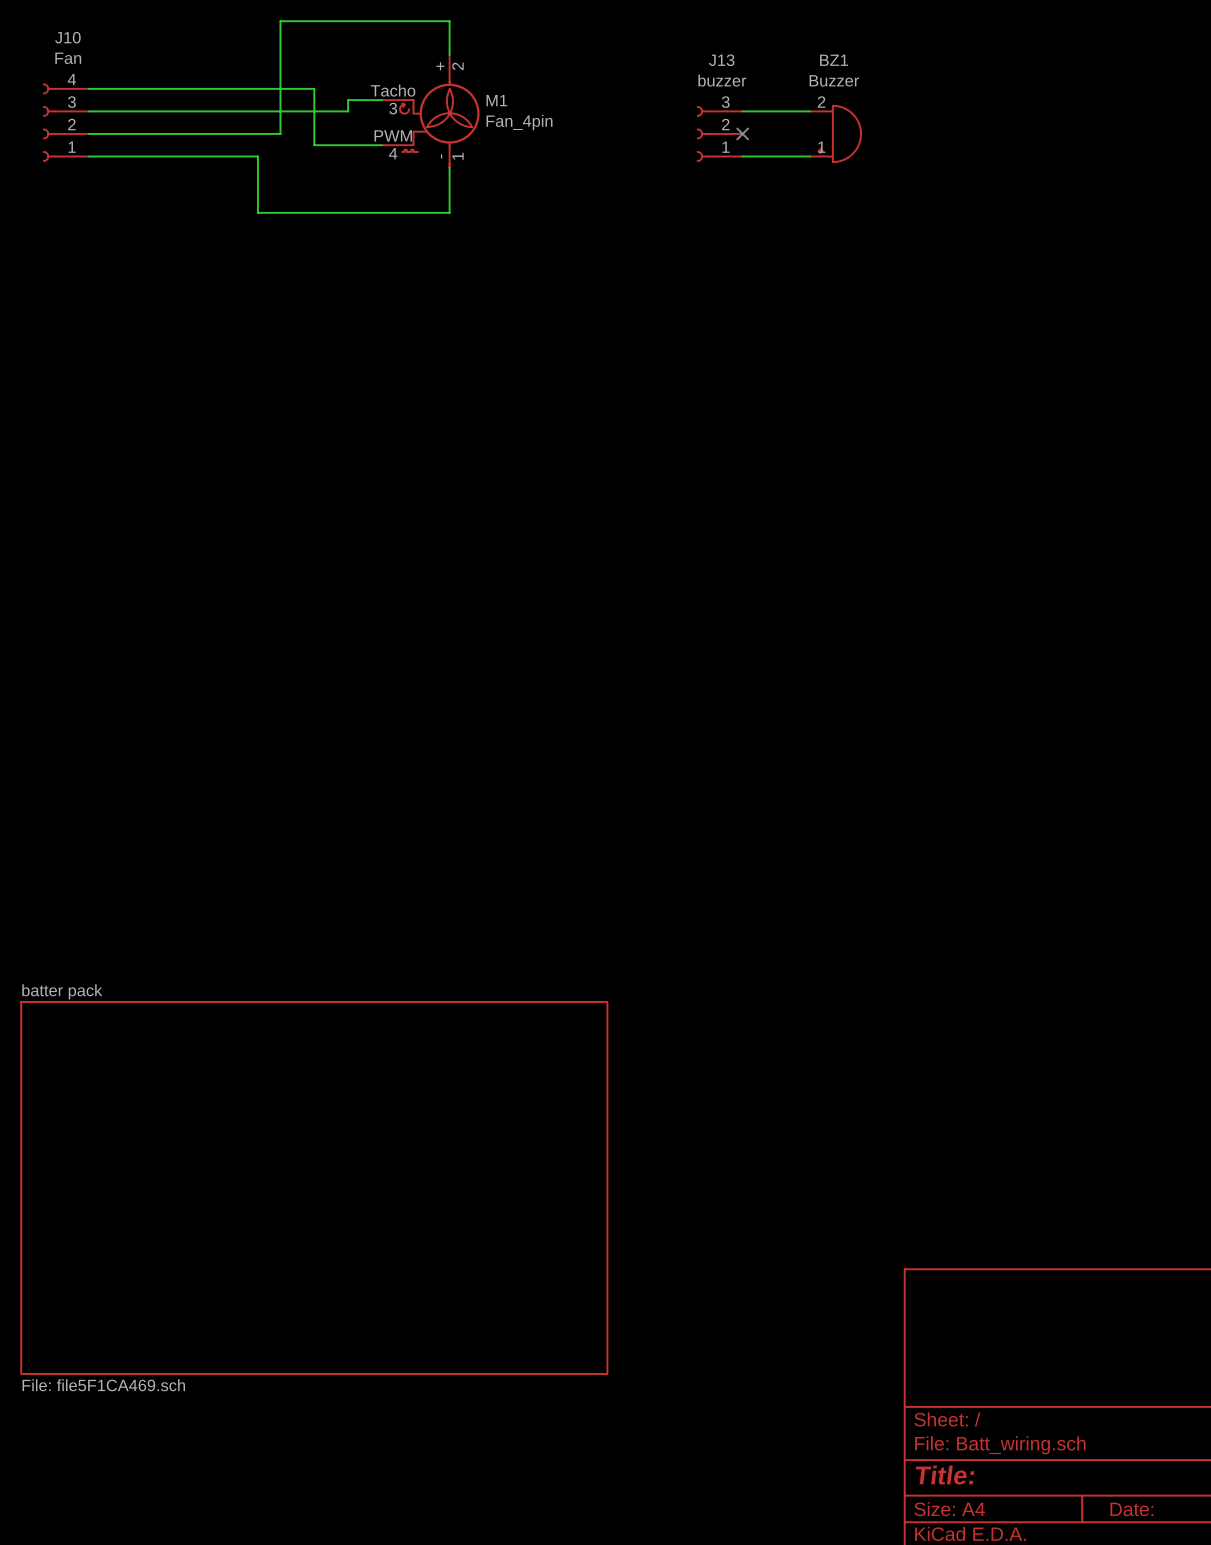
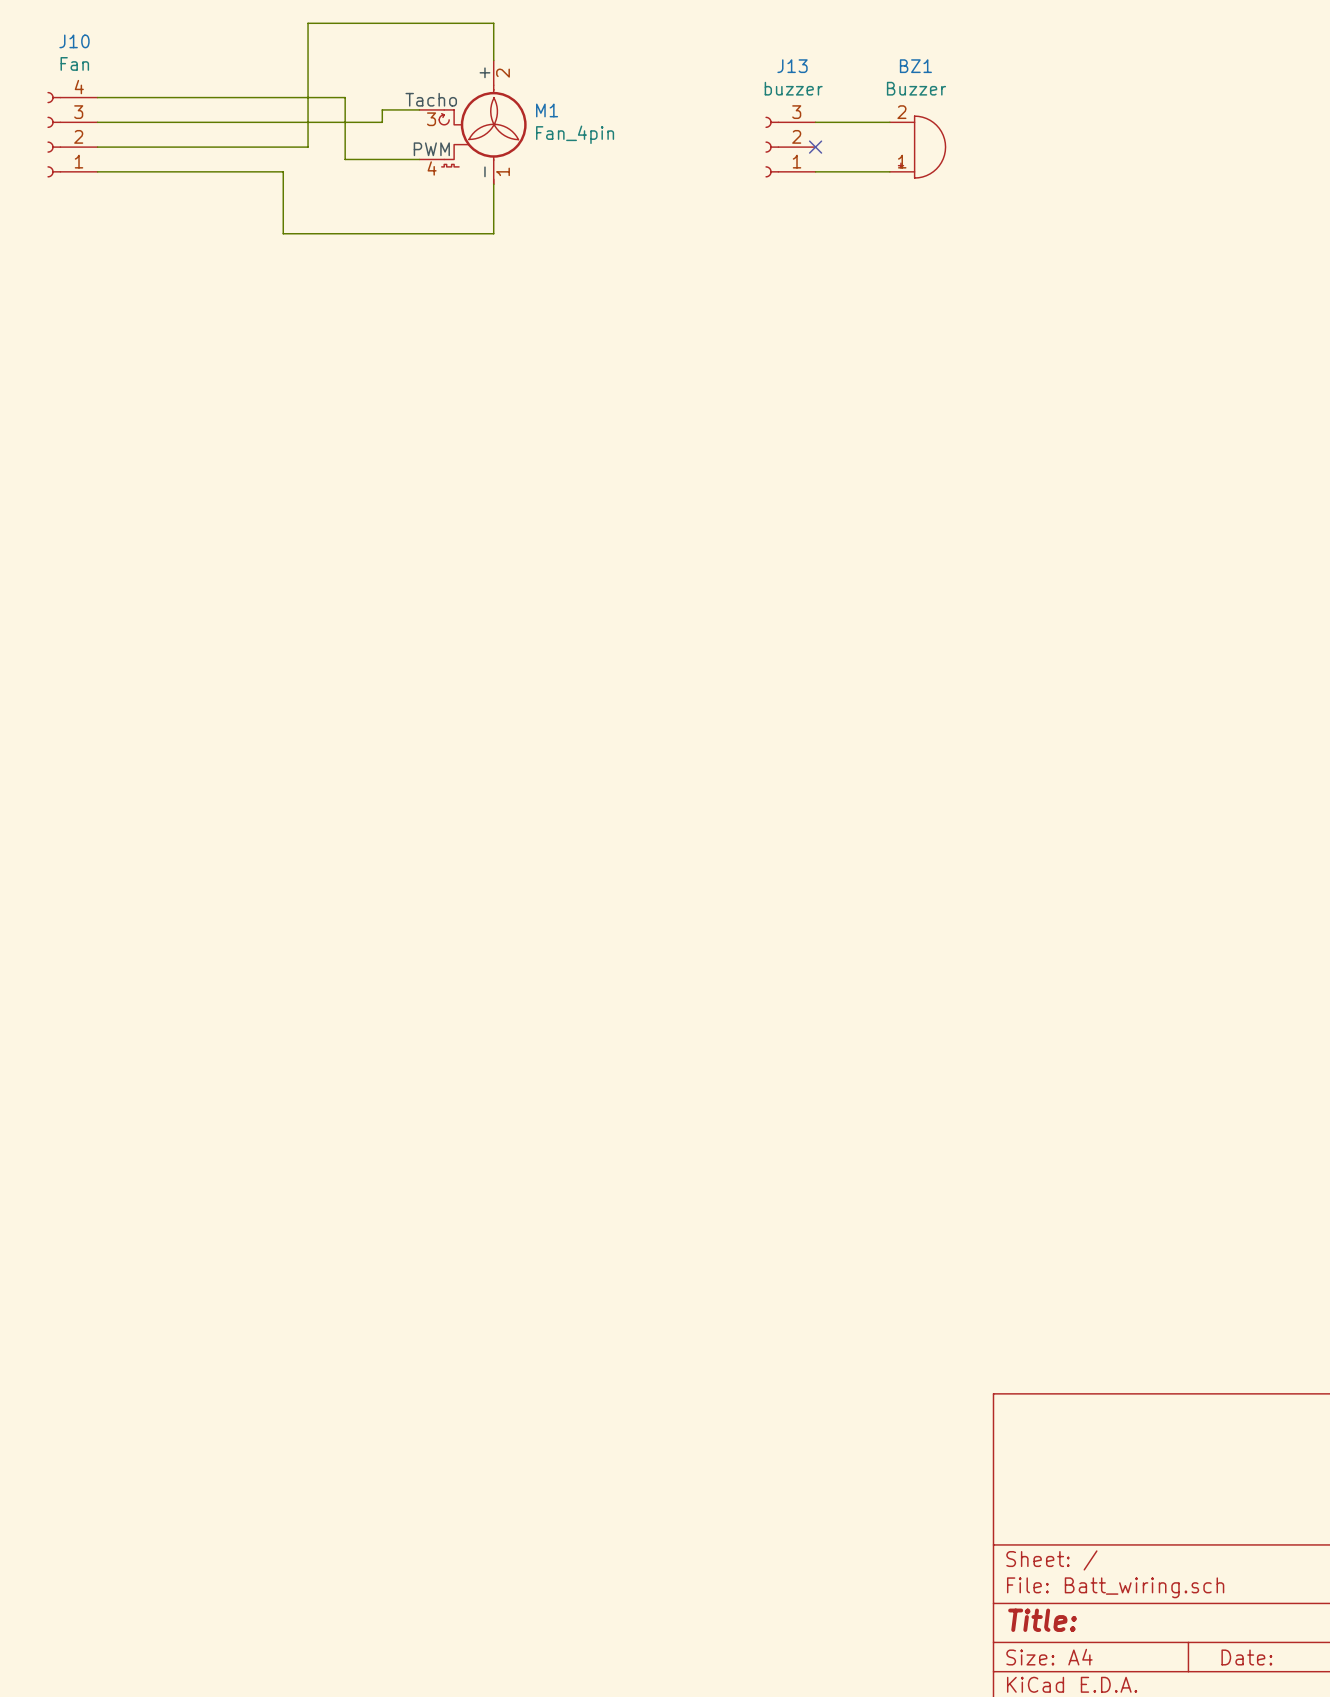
sheet batter pack: File: file5F1CA469.sch (314, 1187) -> none

